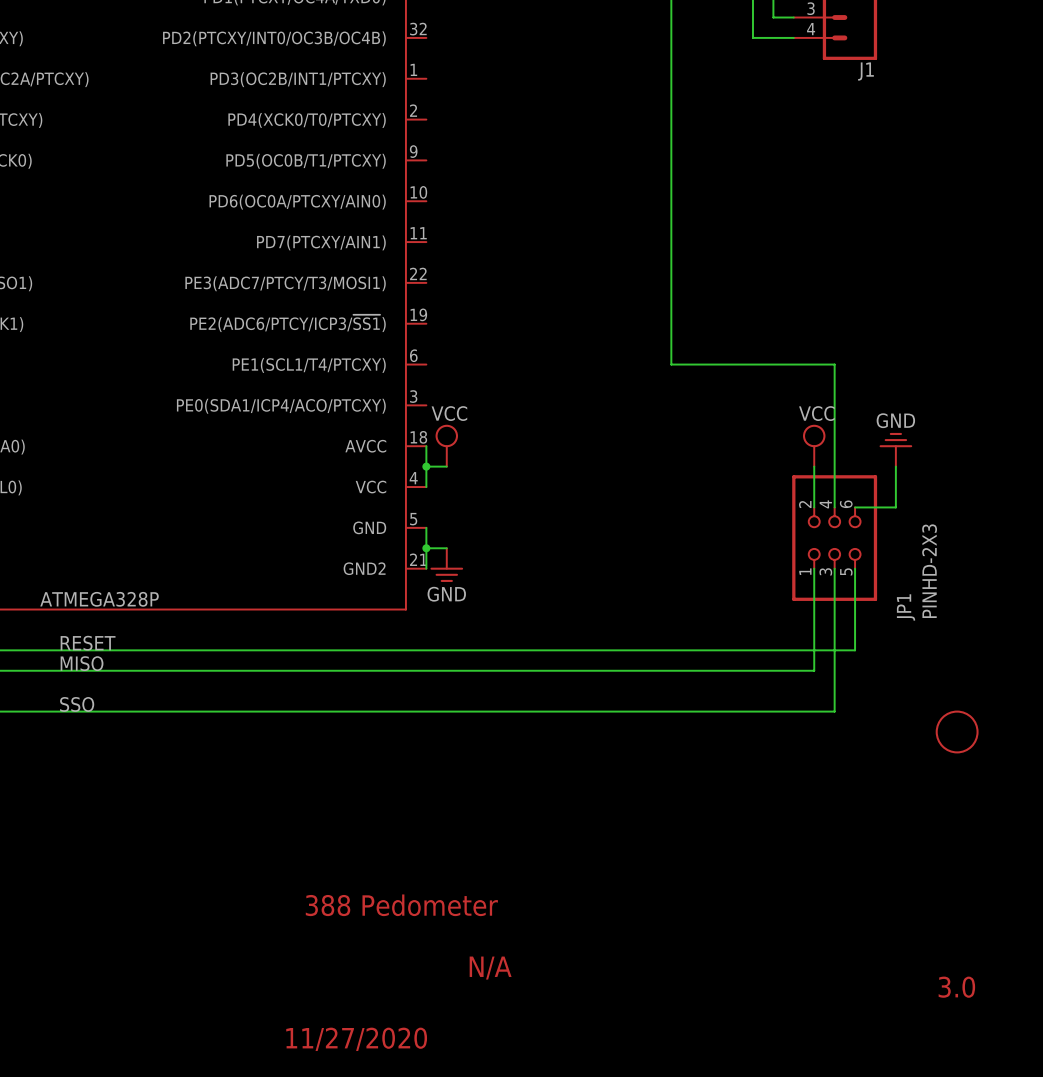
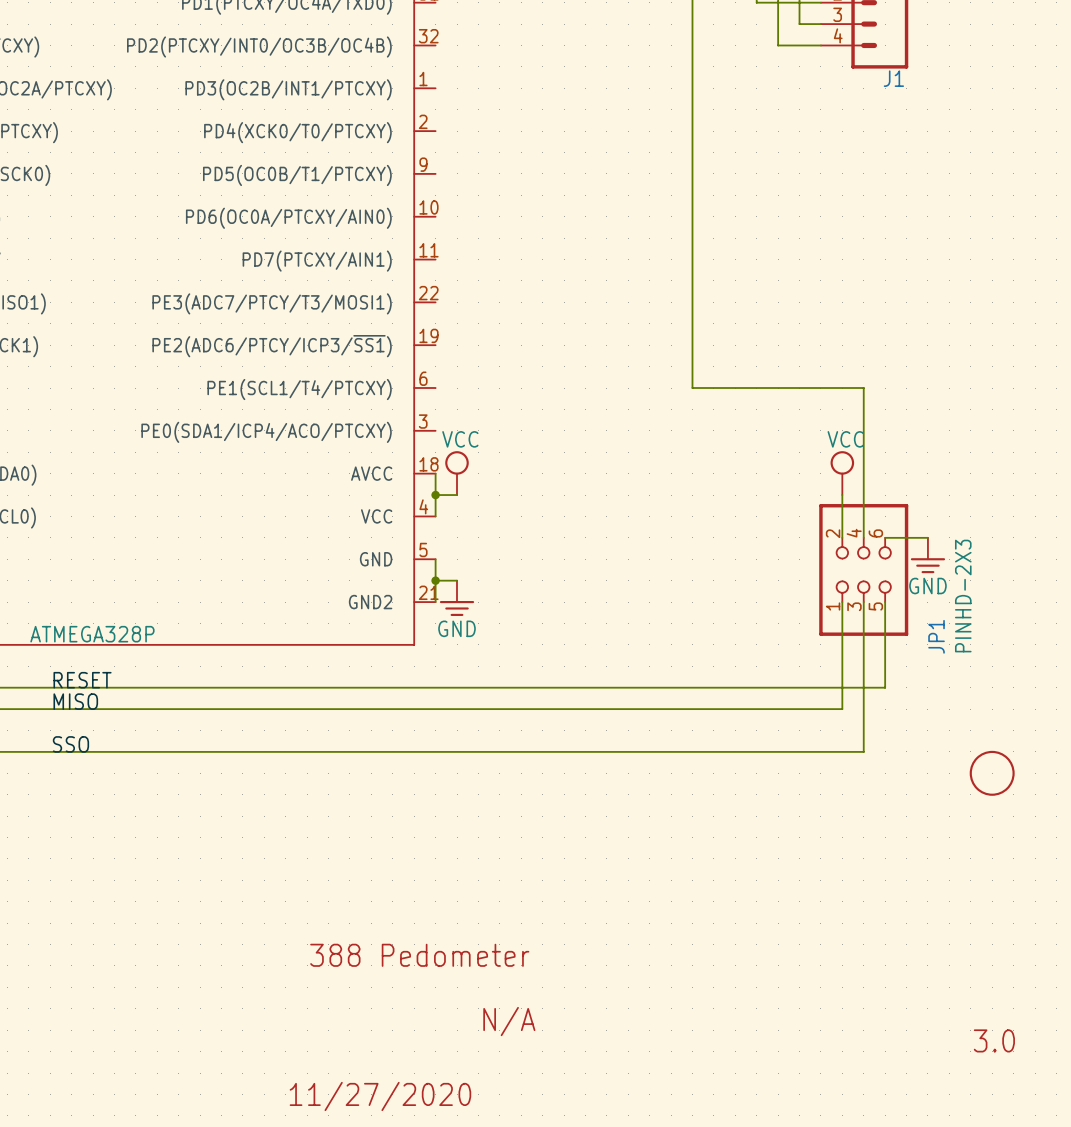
power symbol rotation: 0° (895, 440) -> 180° (927, 565)
power symbol position: GND (895, 449) -> GND (927, 555)
wire: (895, 466) (895, 507) -> none

